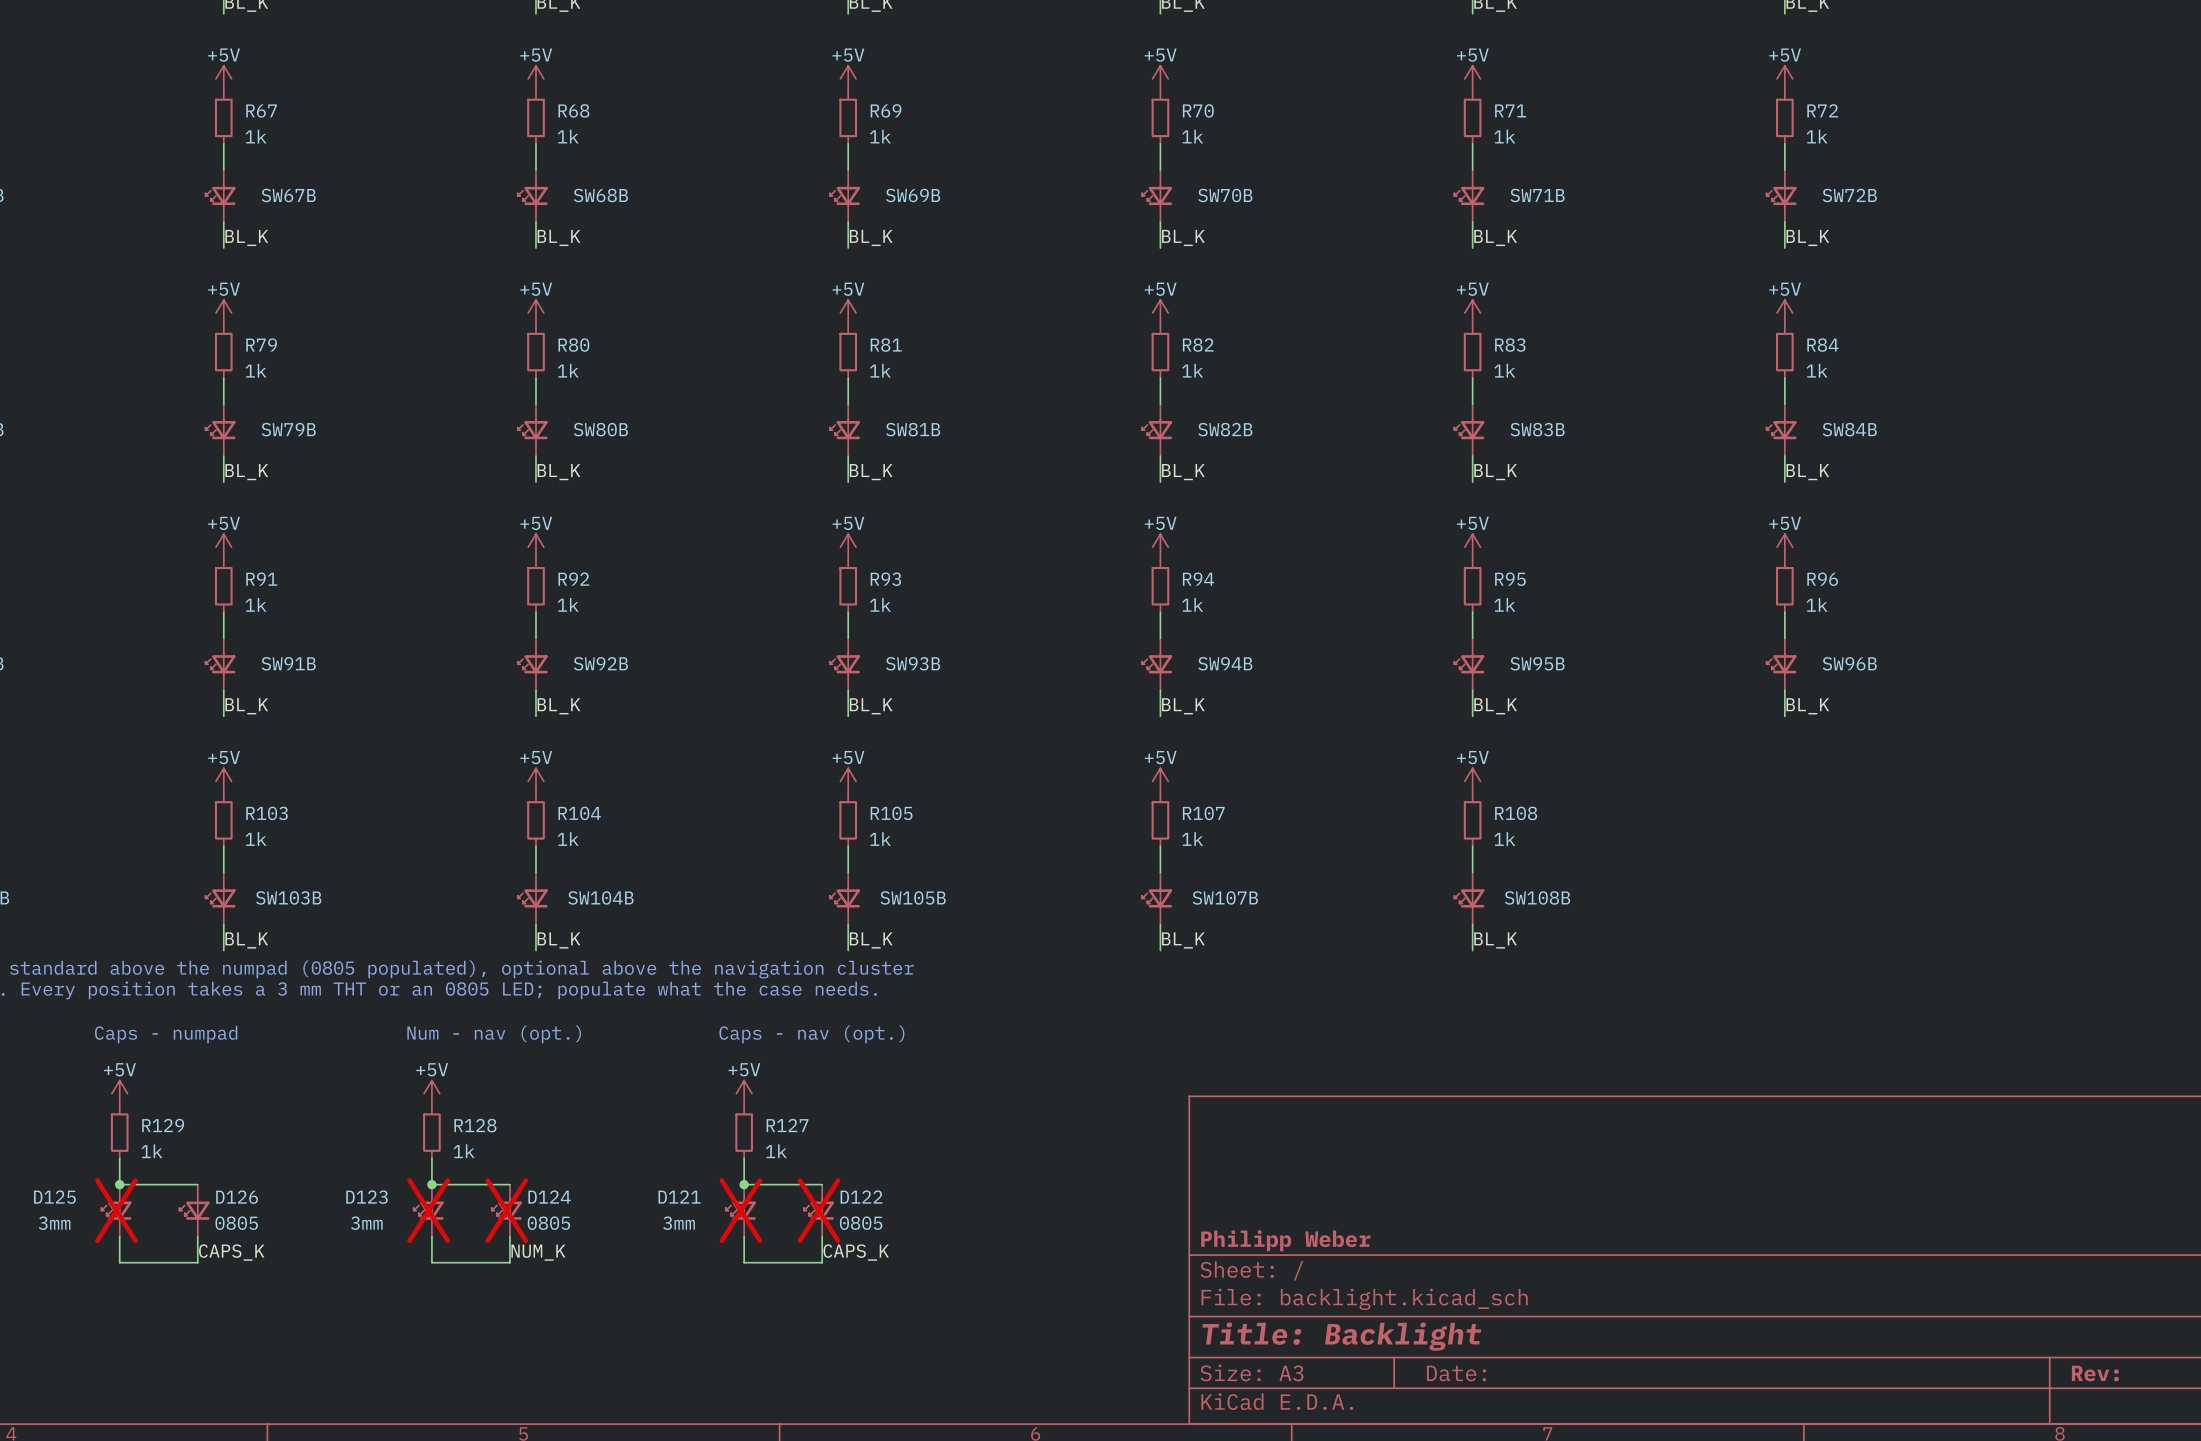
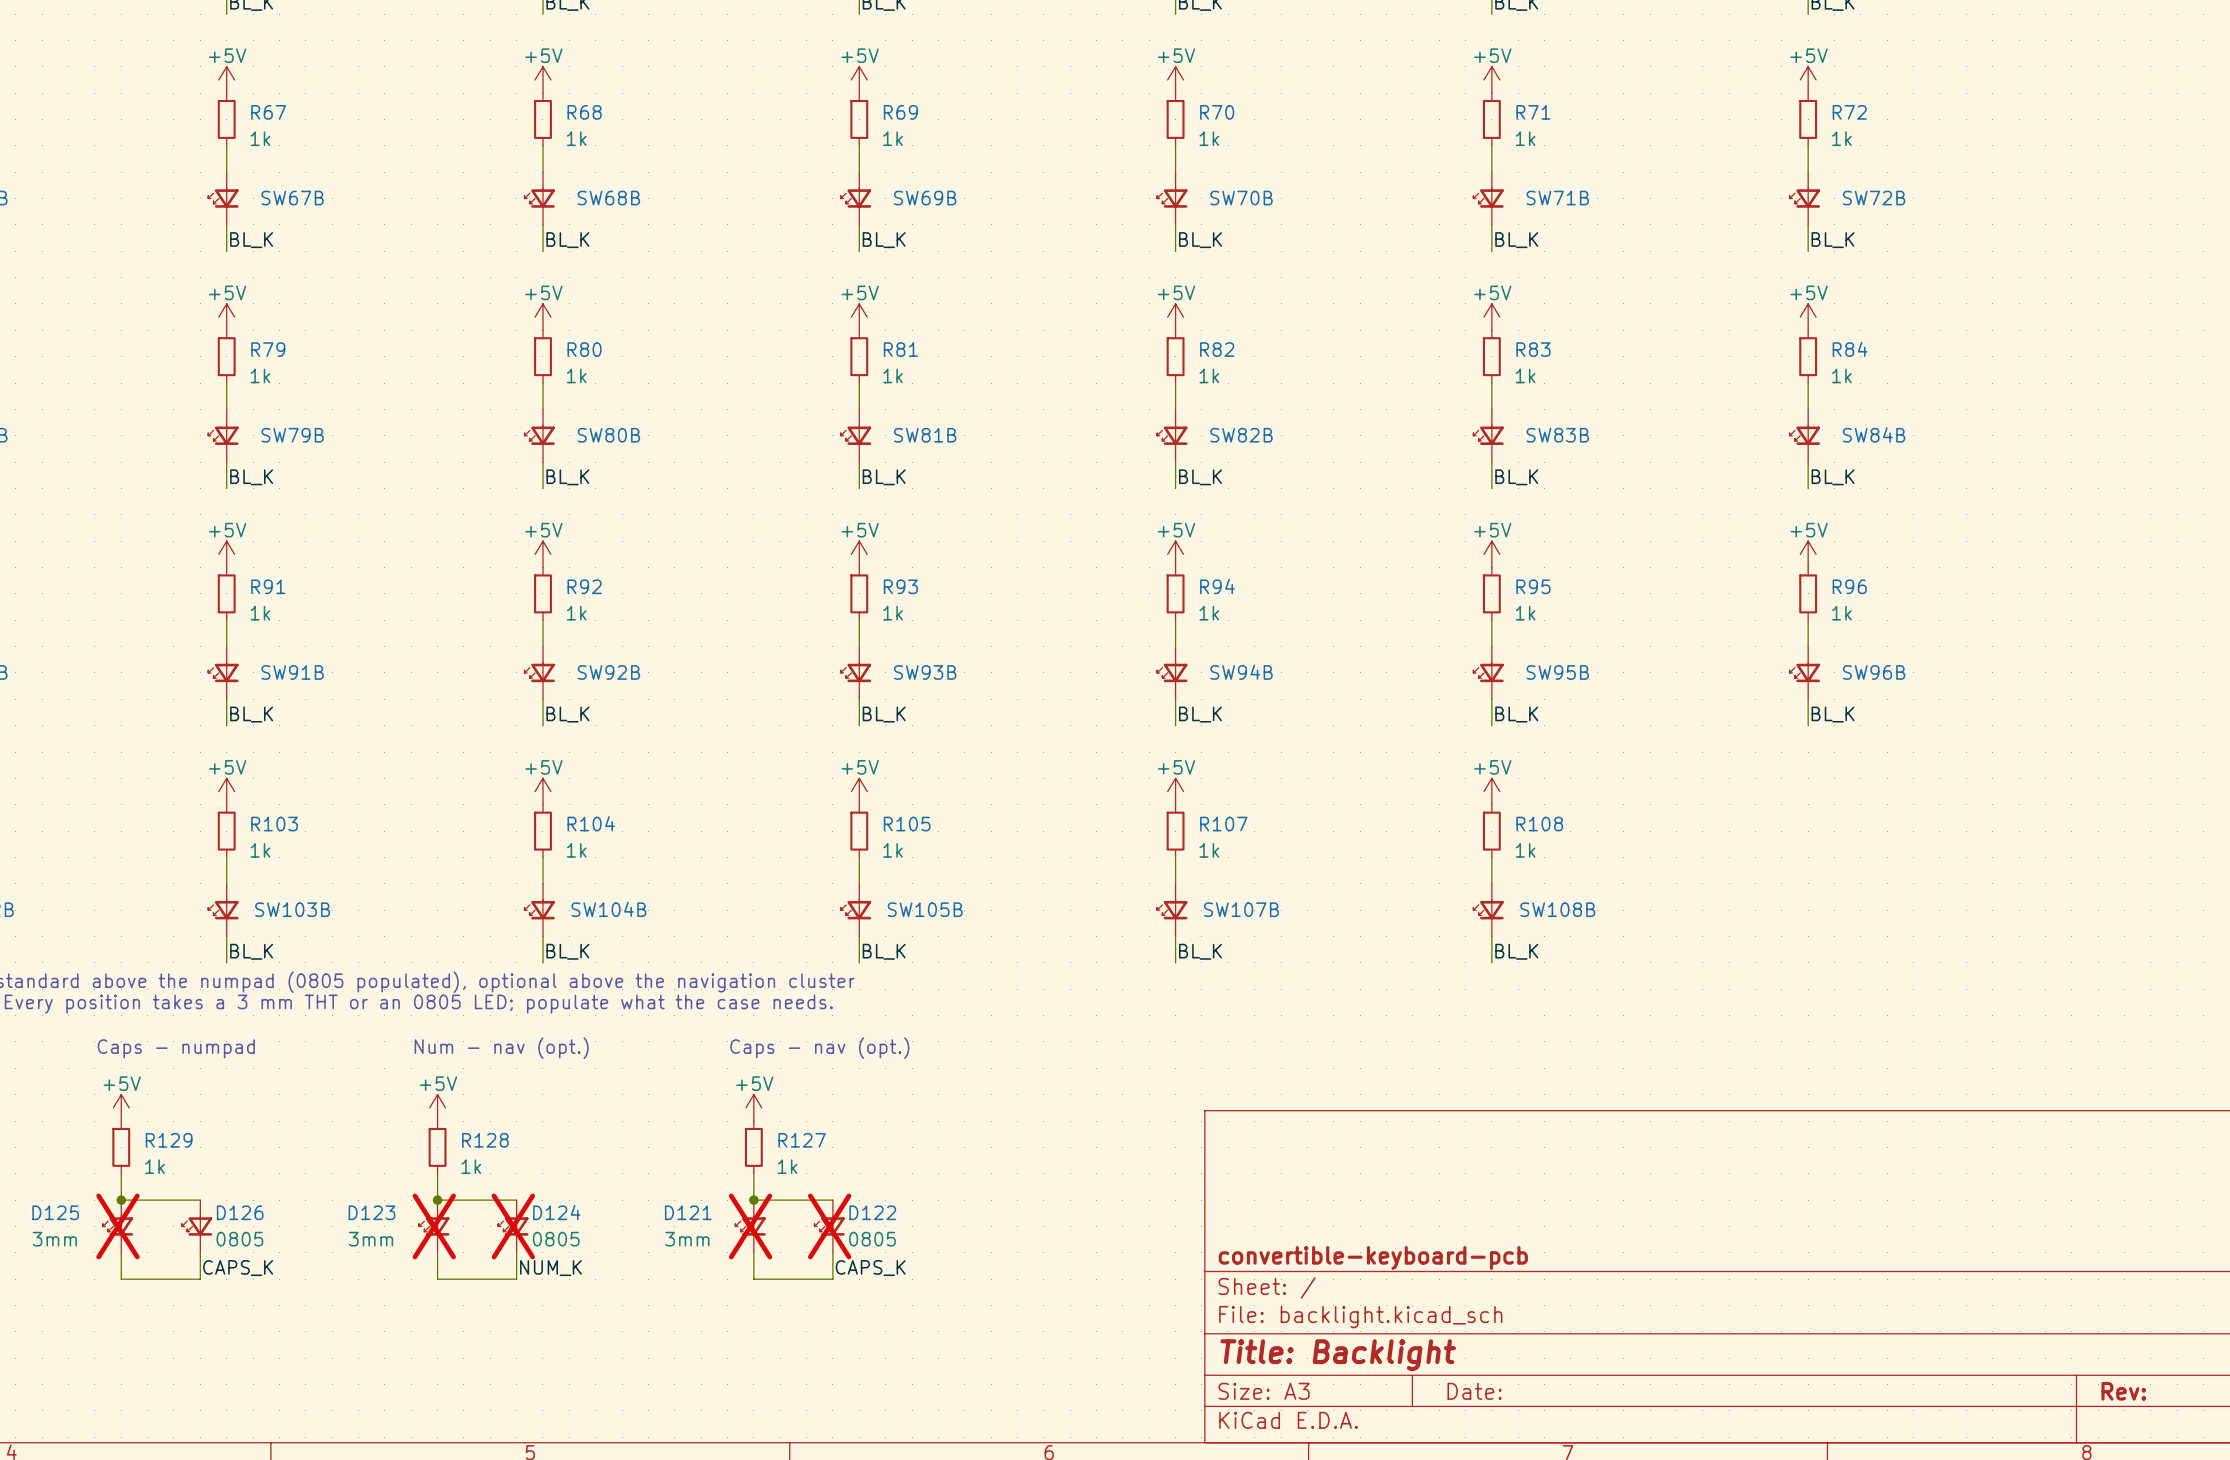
title block: Philipp Weber (1285, 1240) -> convertible-keyboard-pcb (1373, 1257)

